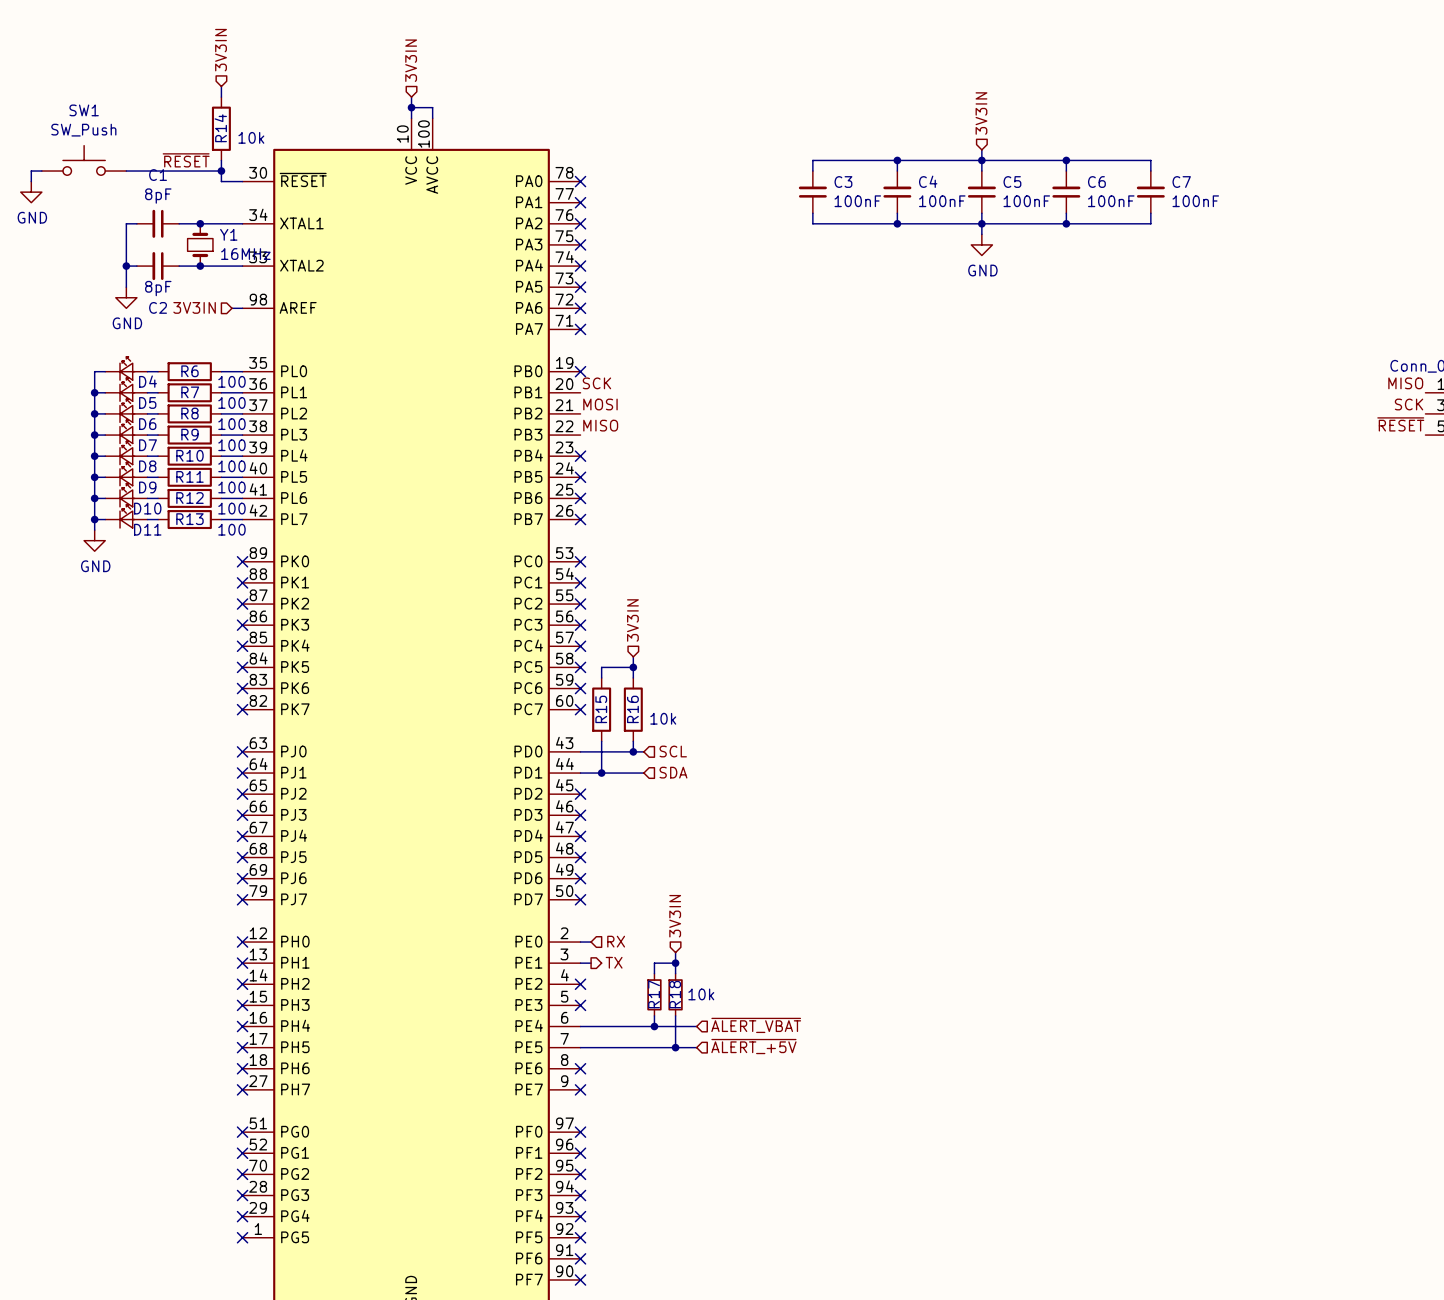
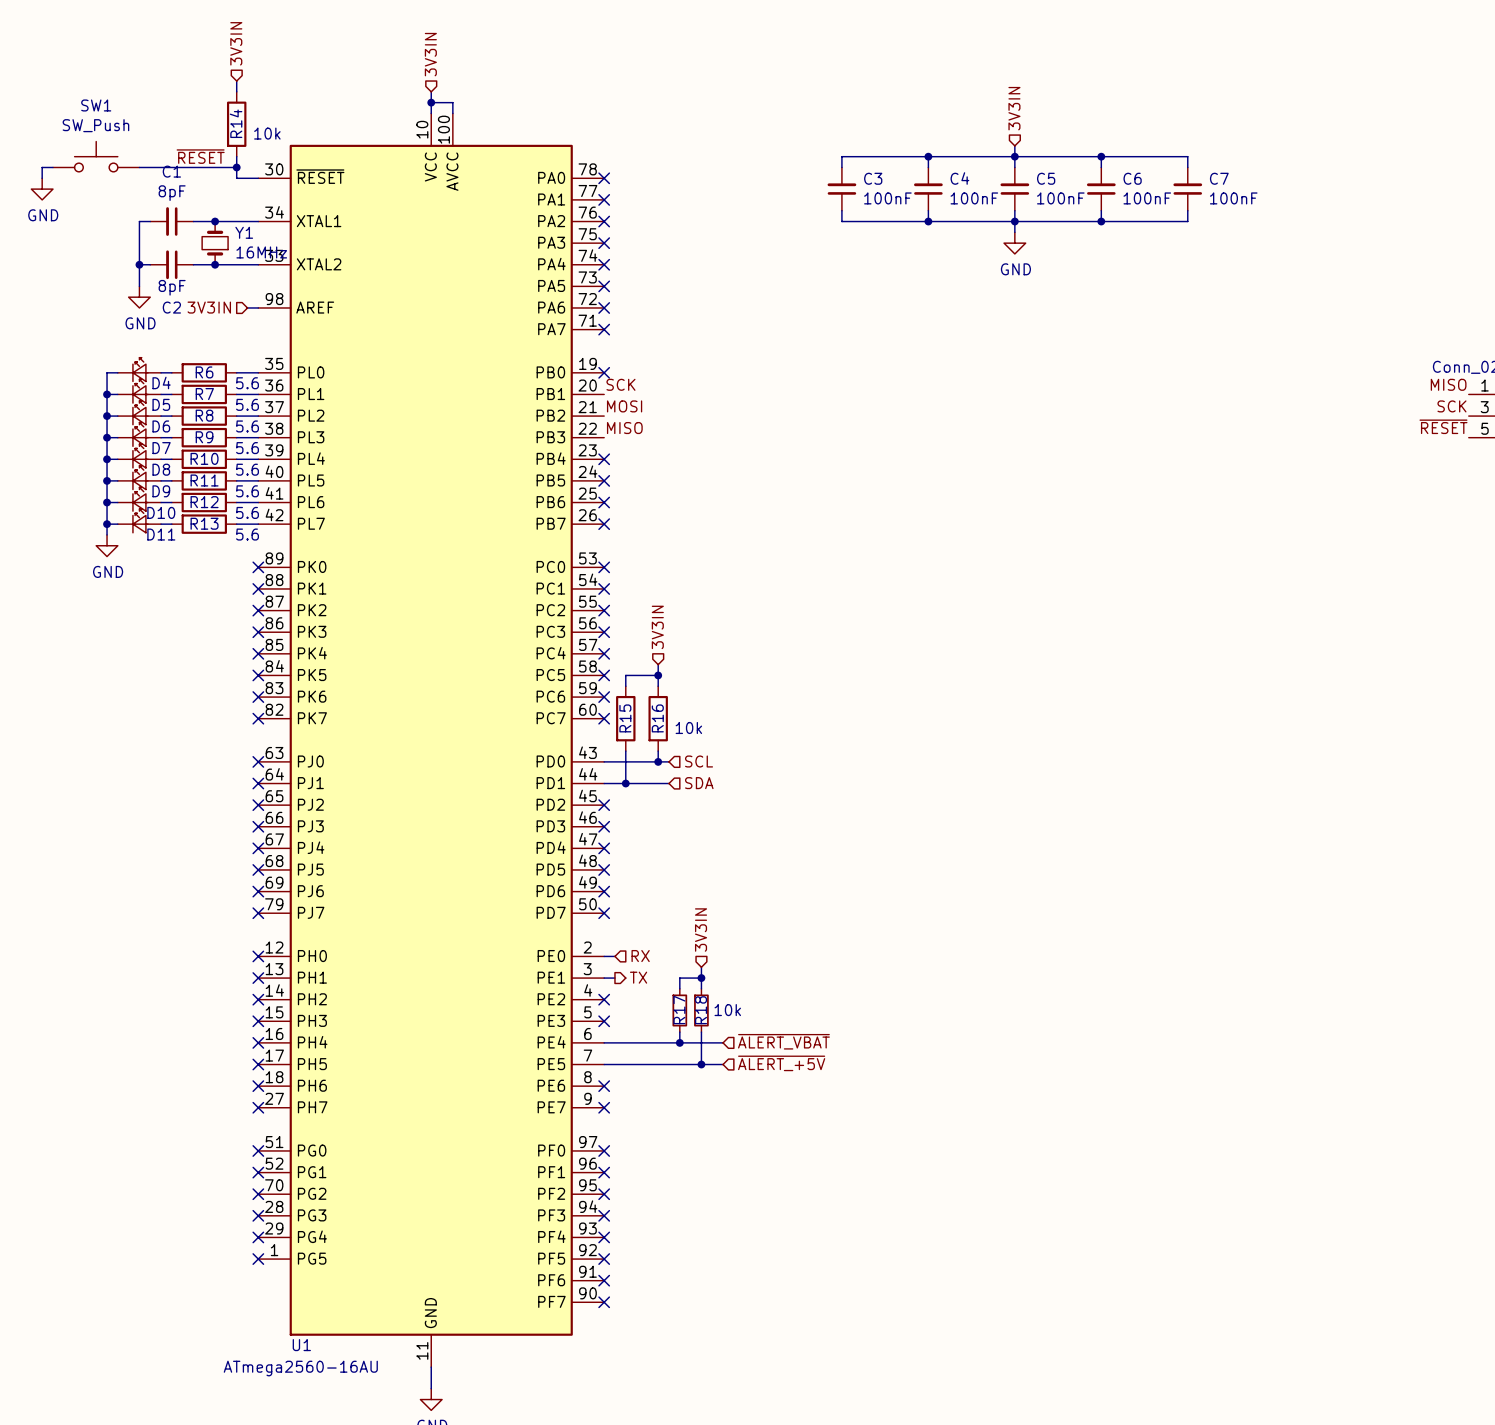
R6 value: 100 (231, 381) -> 5.6 (247, 383)
R7 value: 100 (231, 402) -> 5.6 (247, 404)
R8 value: 100 (231, 424) -> 5.6 (247, 426)
R9 value: 100 (231, 445) -> 5.6 (247, 448)
R10 value: 100 (231, 466) -> 5.6 (247, 469)
R11 value: 100 (231, 487) -> 5.6 (247, 491)
R12 value: 100 (231, 508) -> 5.6 (247, 512)
R13 value: 100 (231, 529) -> 5.6 (247, 534)

